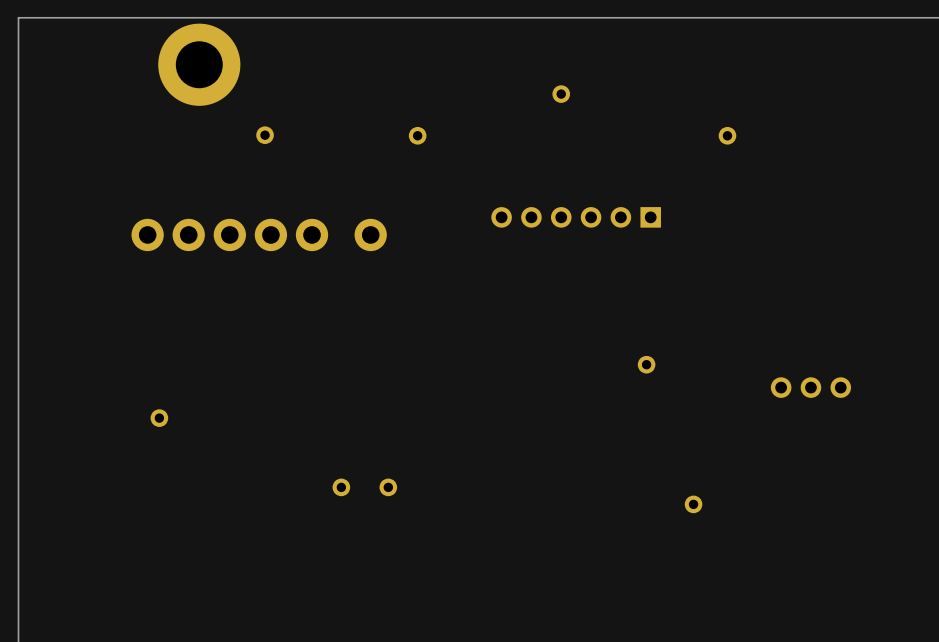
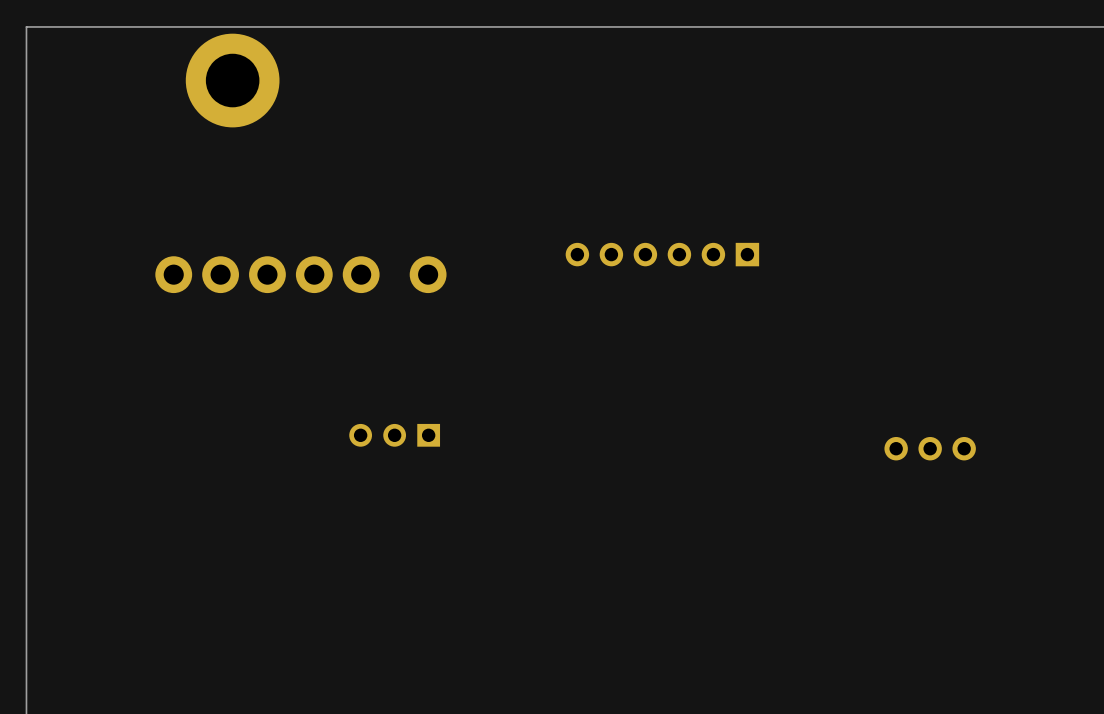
part: (561, 94) -> none
part: (265, 135) -> none
part: (417, 135) -> none
part: (727, 135) -> none
part: (646, 364) -> none
part: none -> (394, 435)
part: (159, 418) -> none
part: (341, 487) -> none
part: (388, 487) -> none
part: (693, 504) -> none

